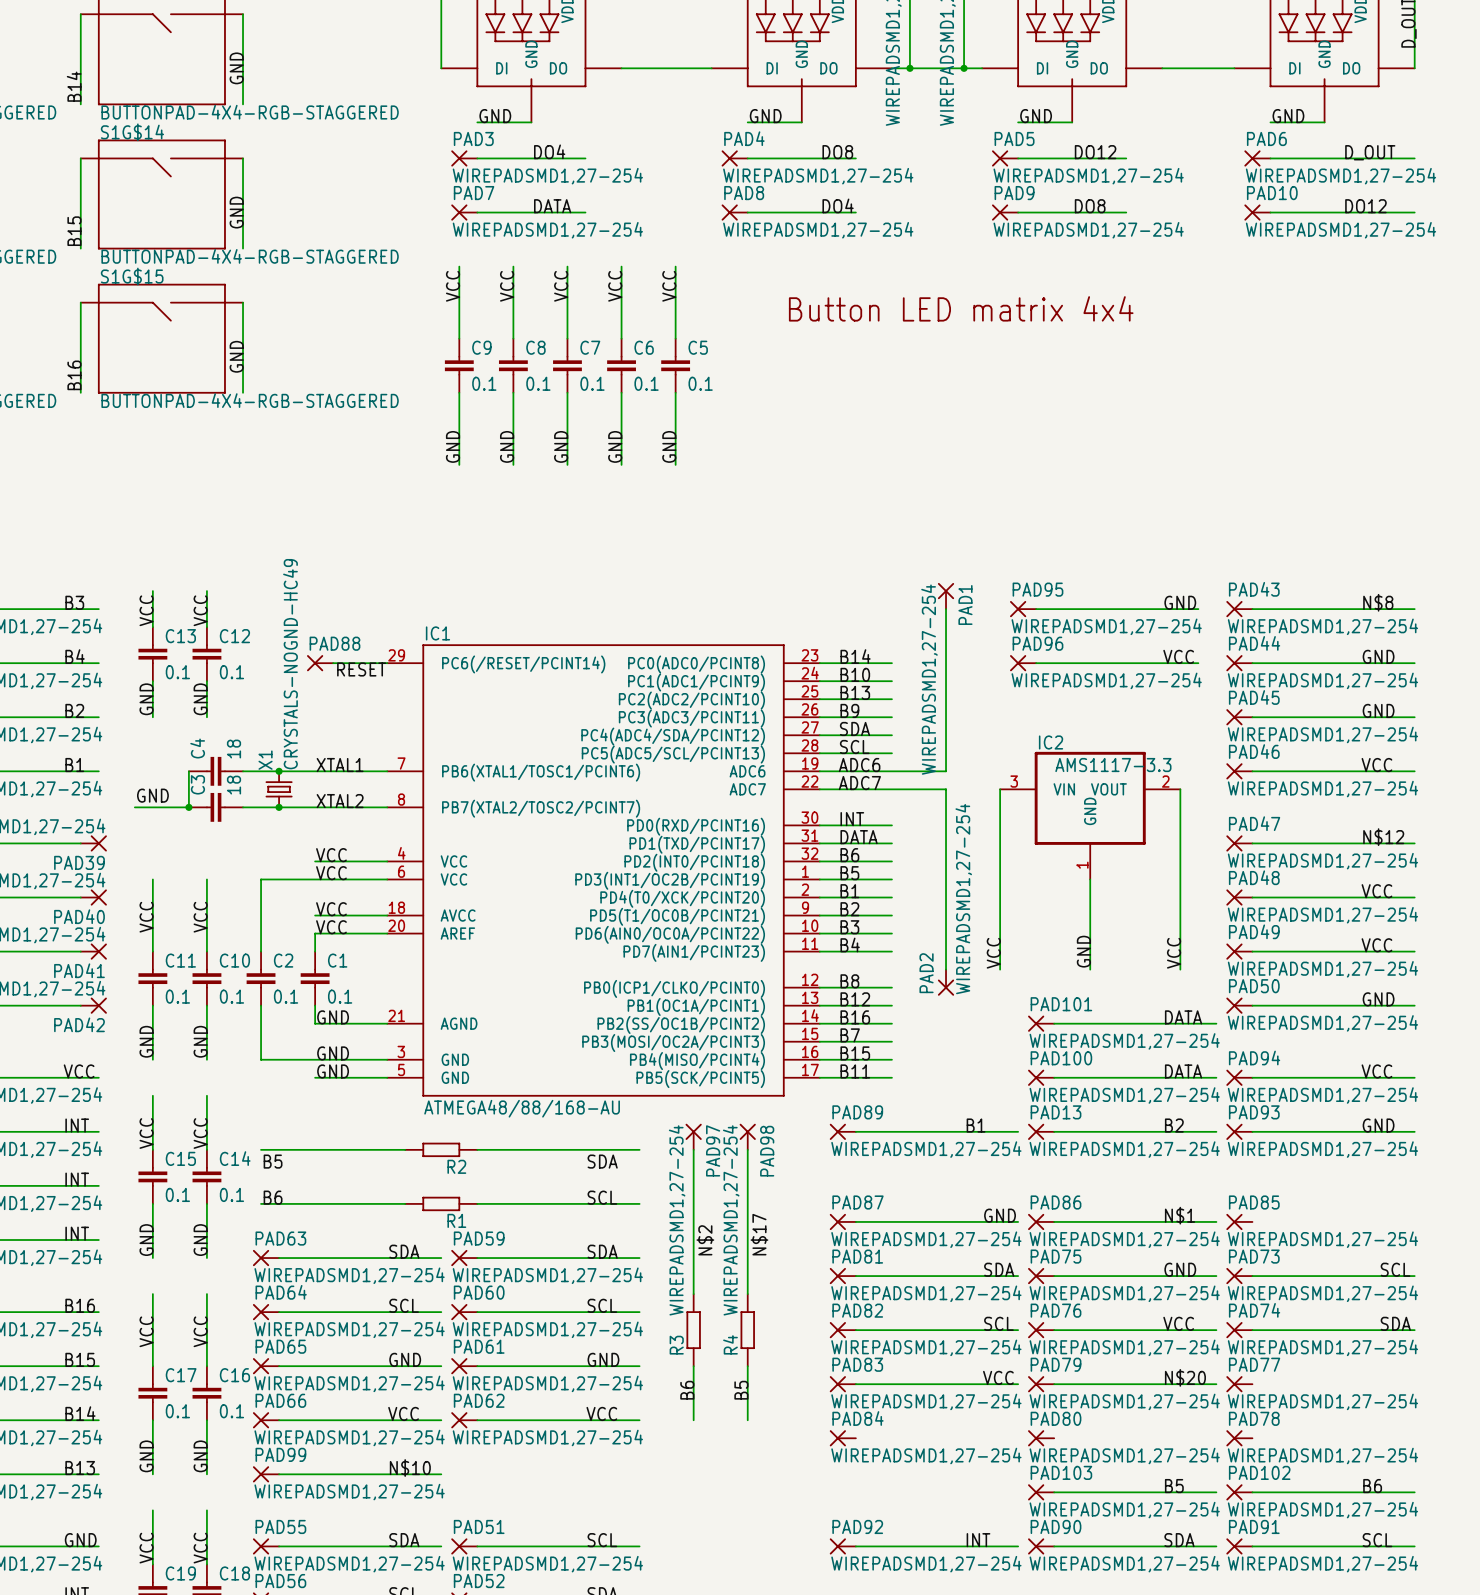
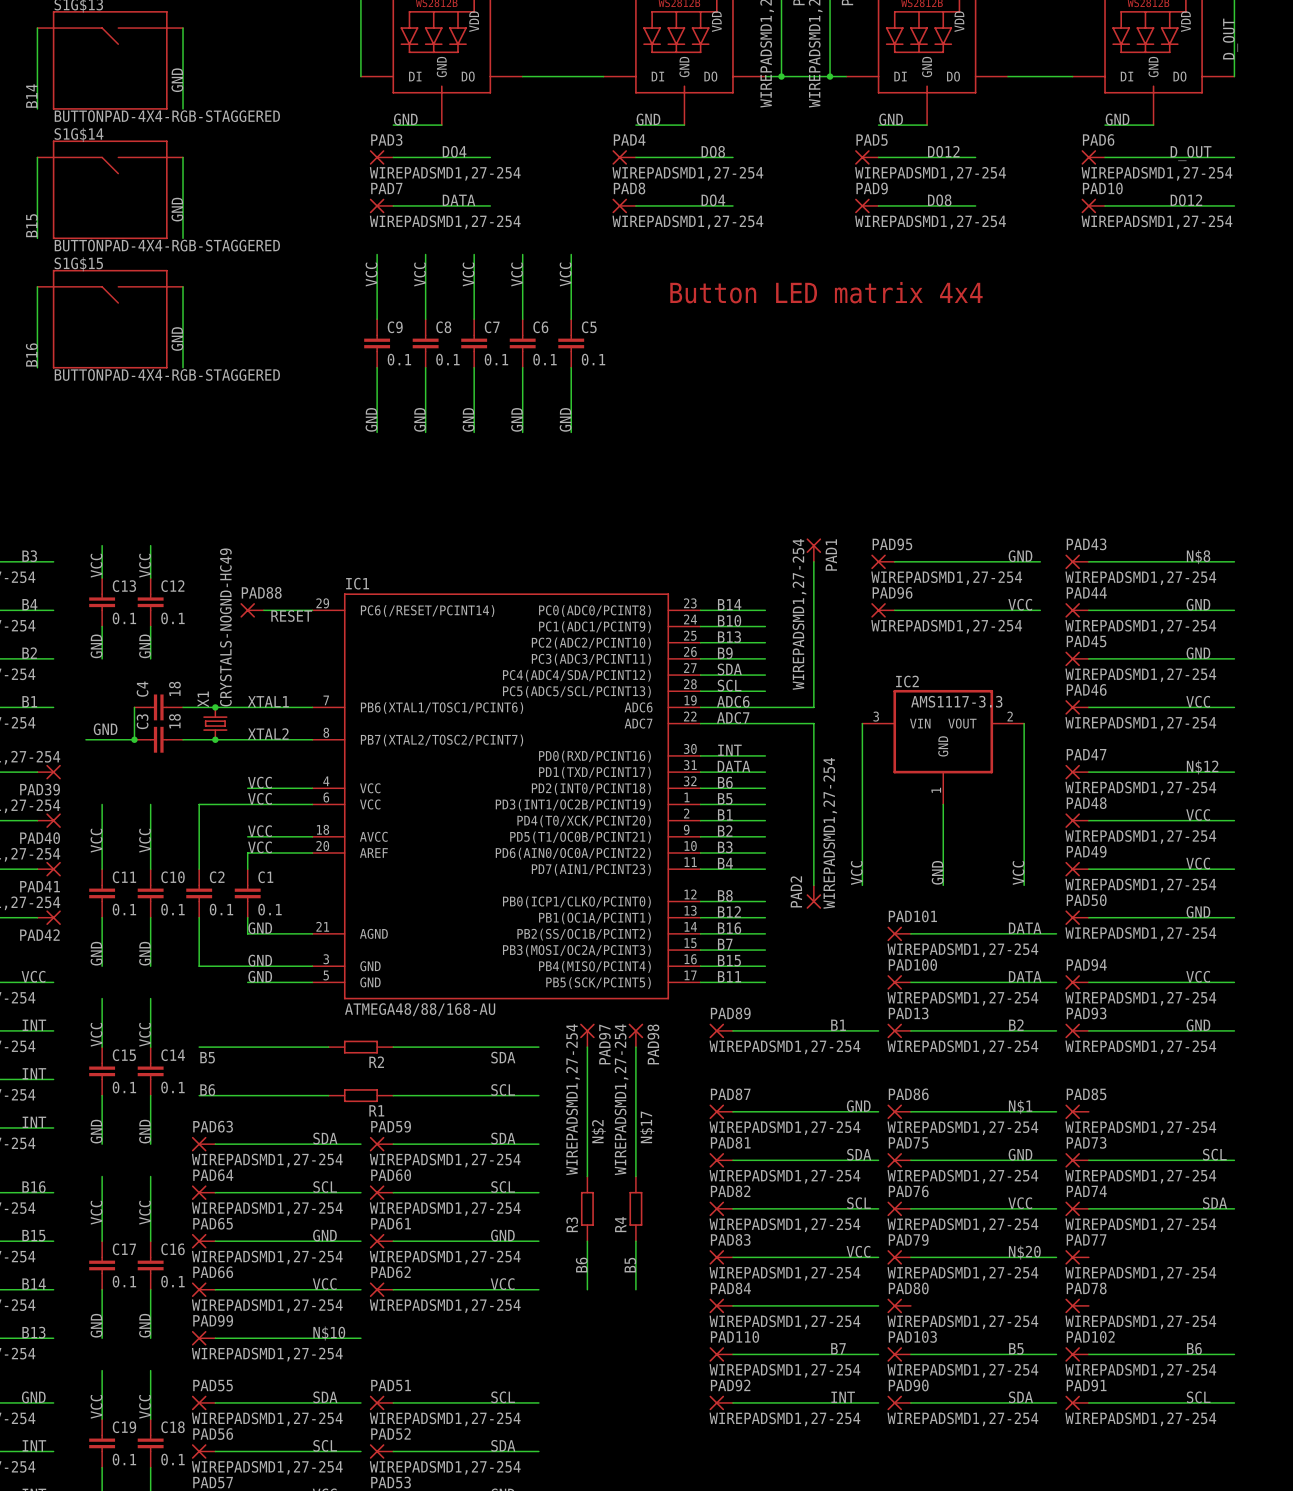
wire: none -> (732, 1305) (878, 1305)
label: none -> B7 (838, 1348)
PAD110: none -> WIREPADSMD1,27-254 (721, 1354)
wire: none -> (732, 1354) (878, 1354)

